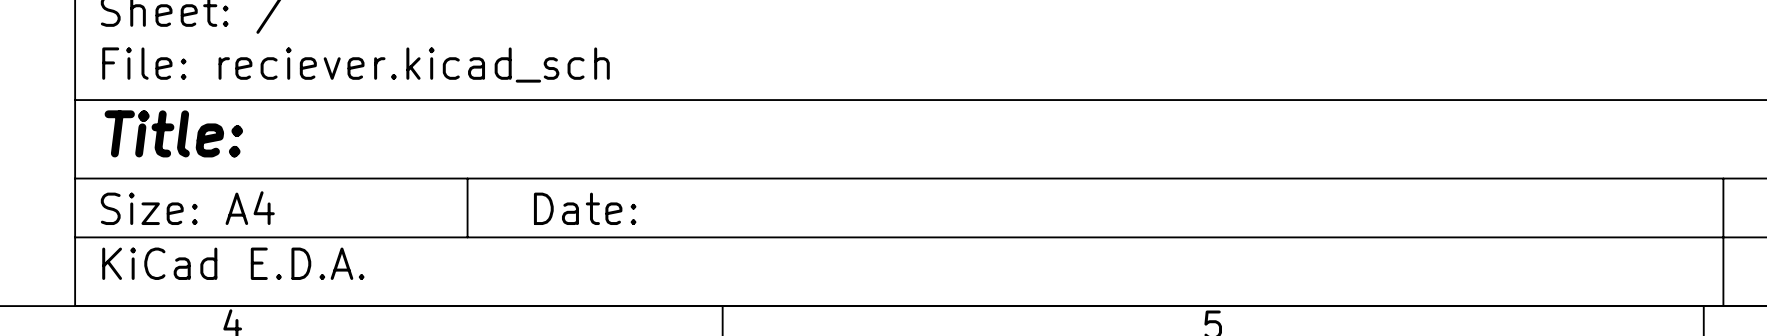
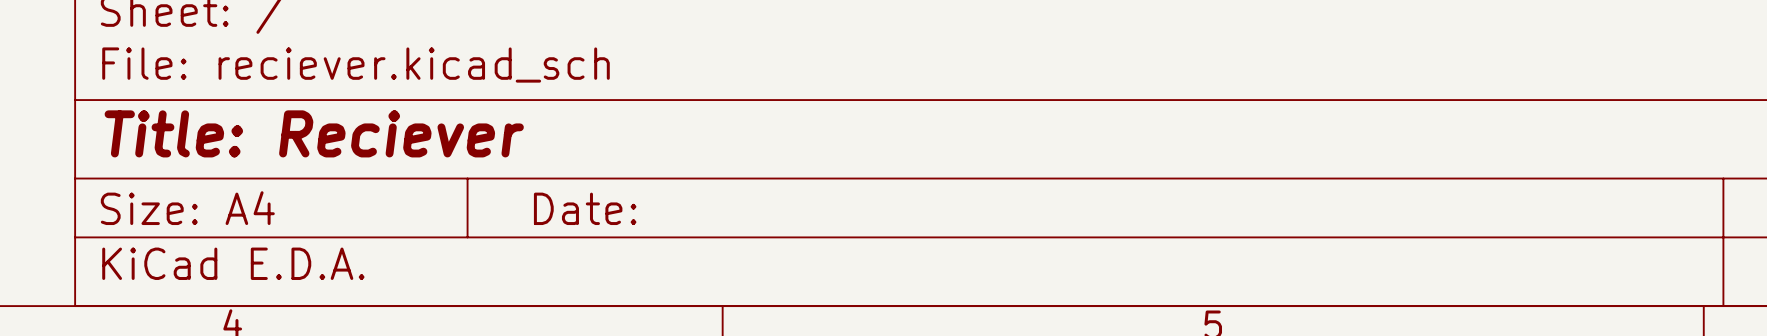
title block: Title: (173, 133) -> Title: Reciever (314, 133)

